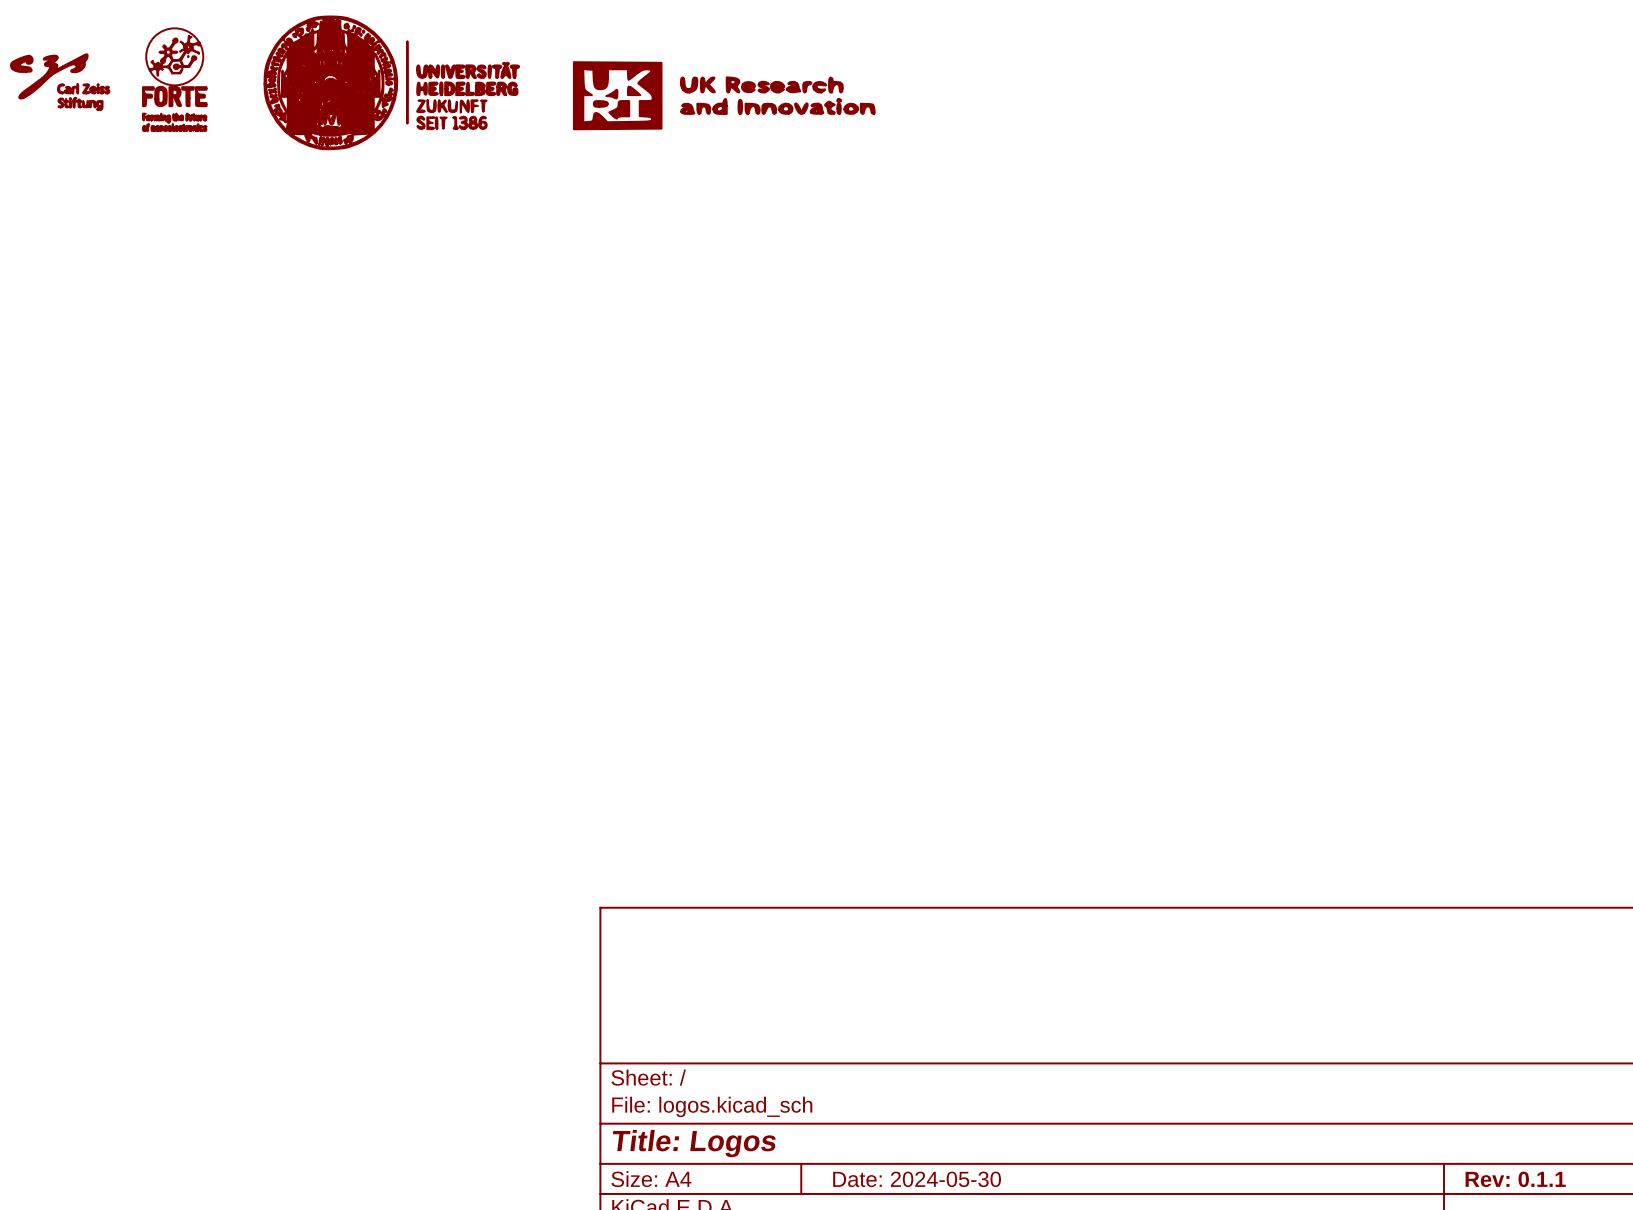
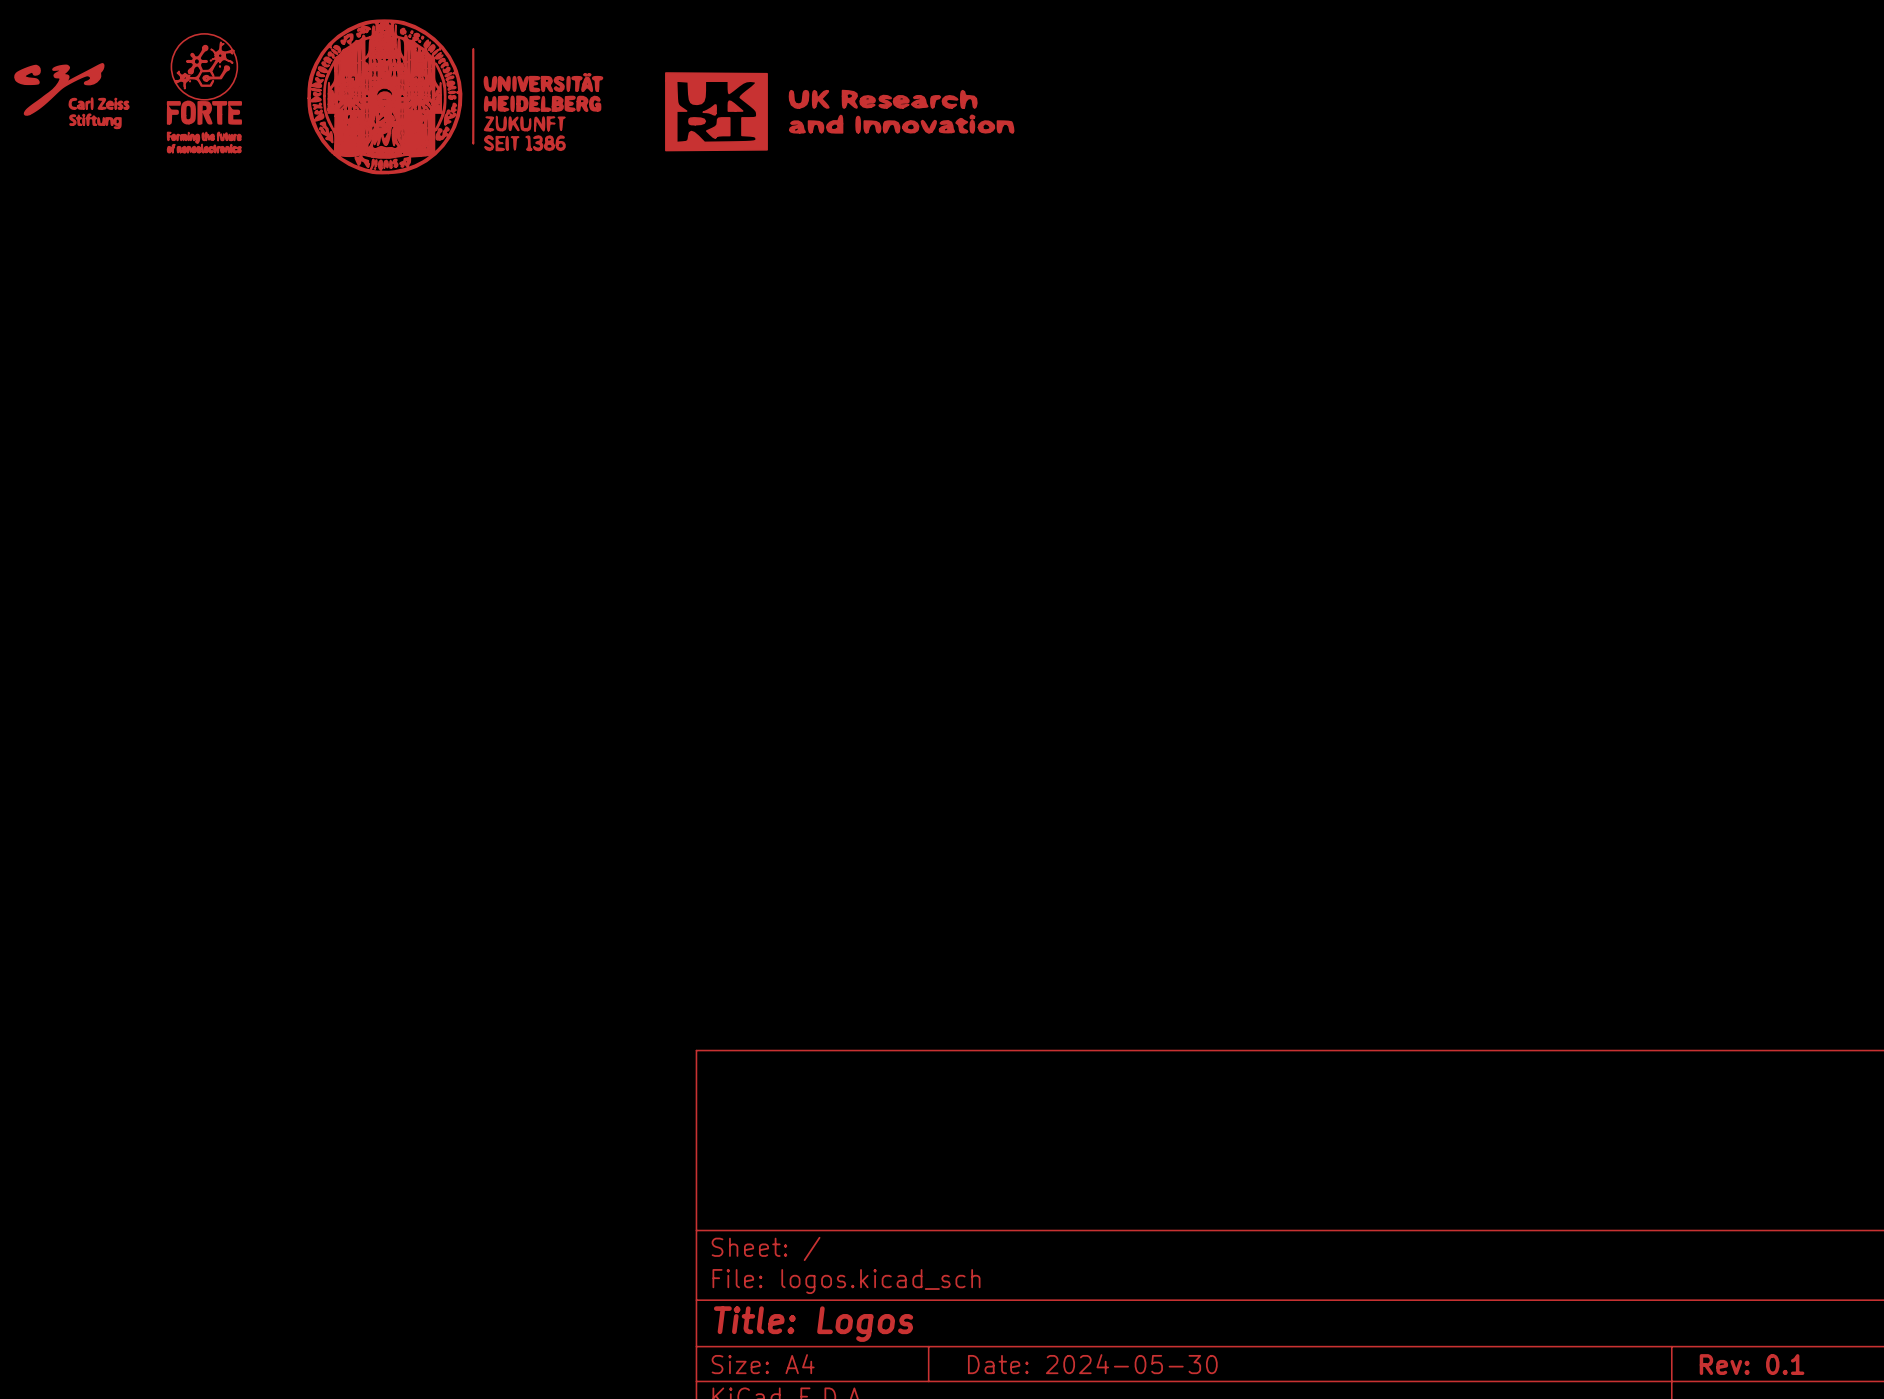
title block: Rev: 0.1.1 (1515, 1179) -> Rev: 0.1 (1752, 1364)

